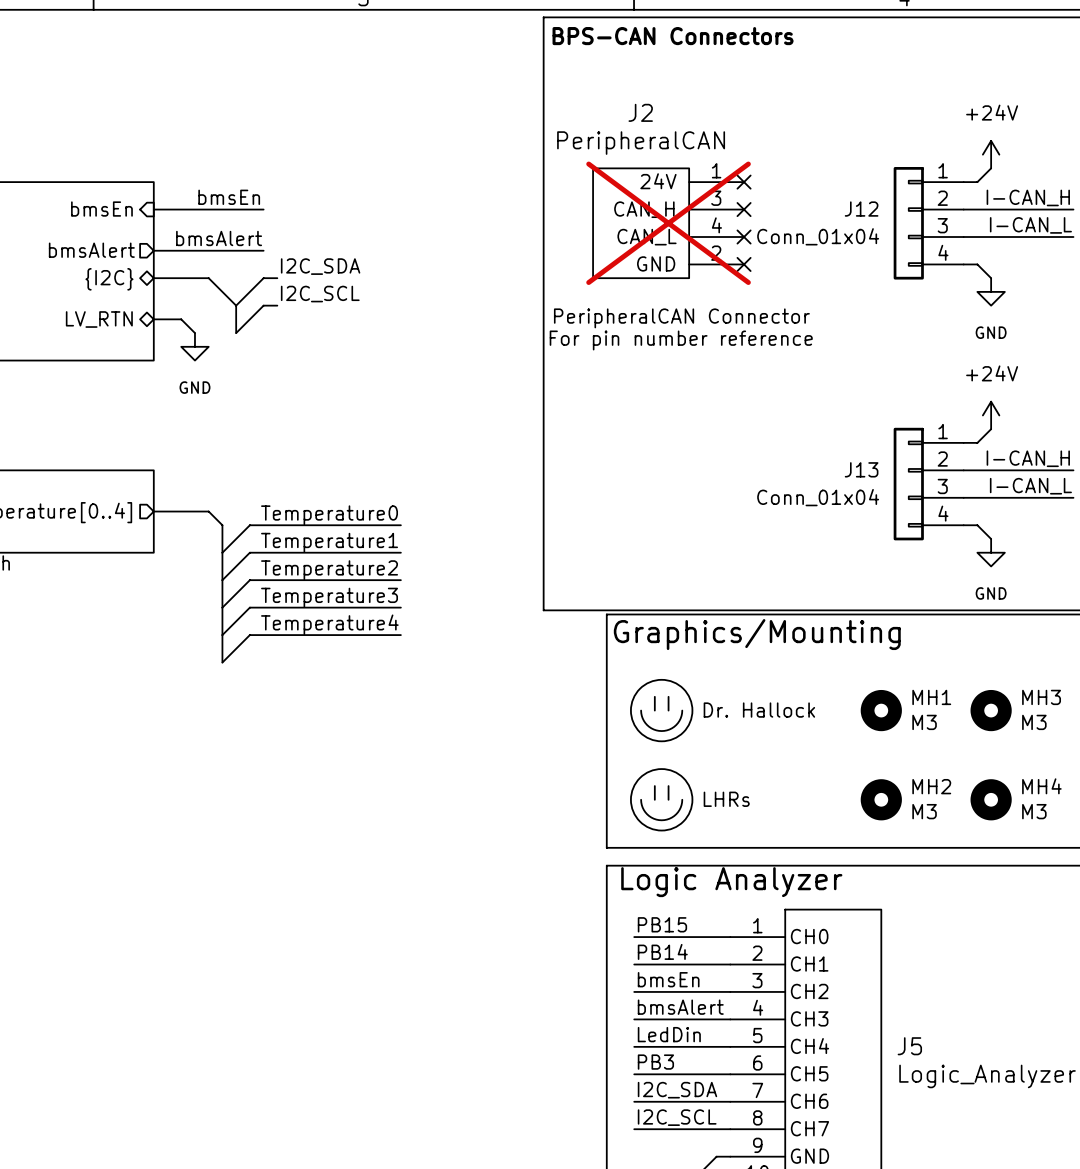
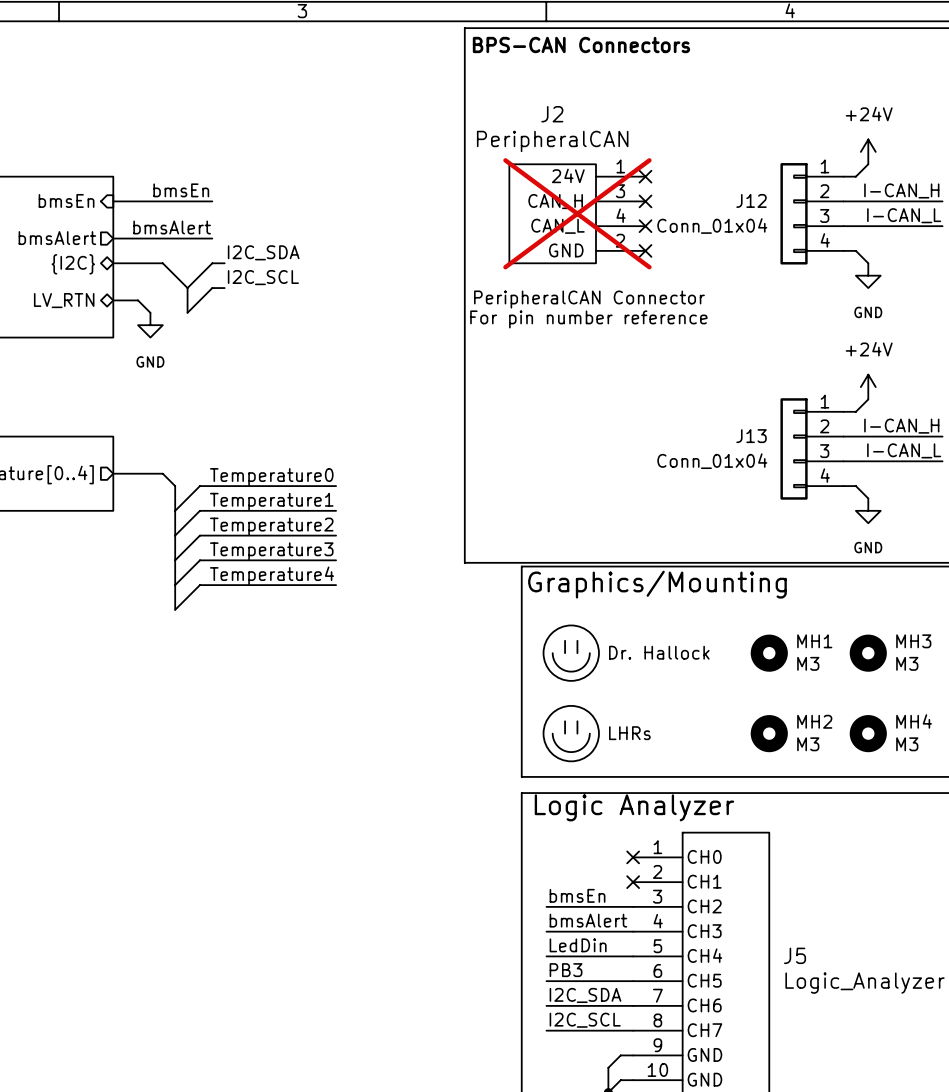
label: PB15 (662, 924) -> none
wire: (634, 937) (730, 937) -> none
no-connect mark: none -> (633, 857)
label: PB14 (662, 951) -> none
wire: (634, 964) (730, 964) -> none
no-connect mark: none -> (633, 882)

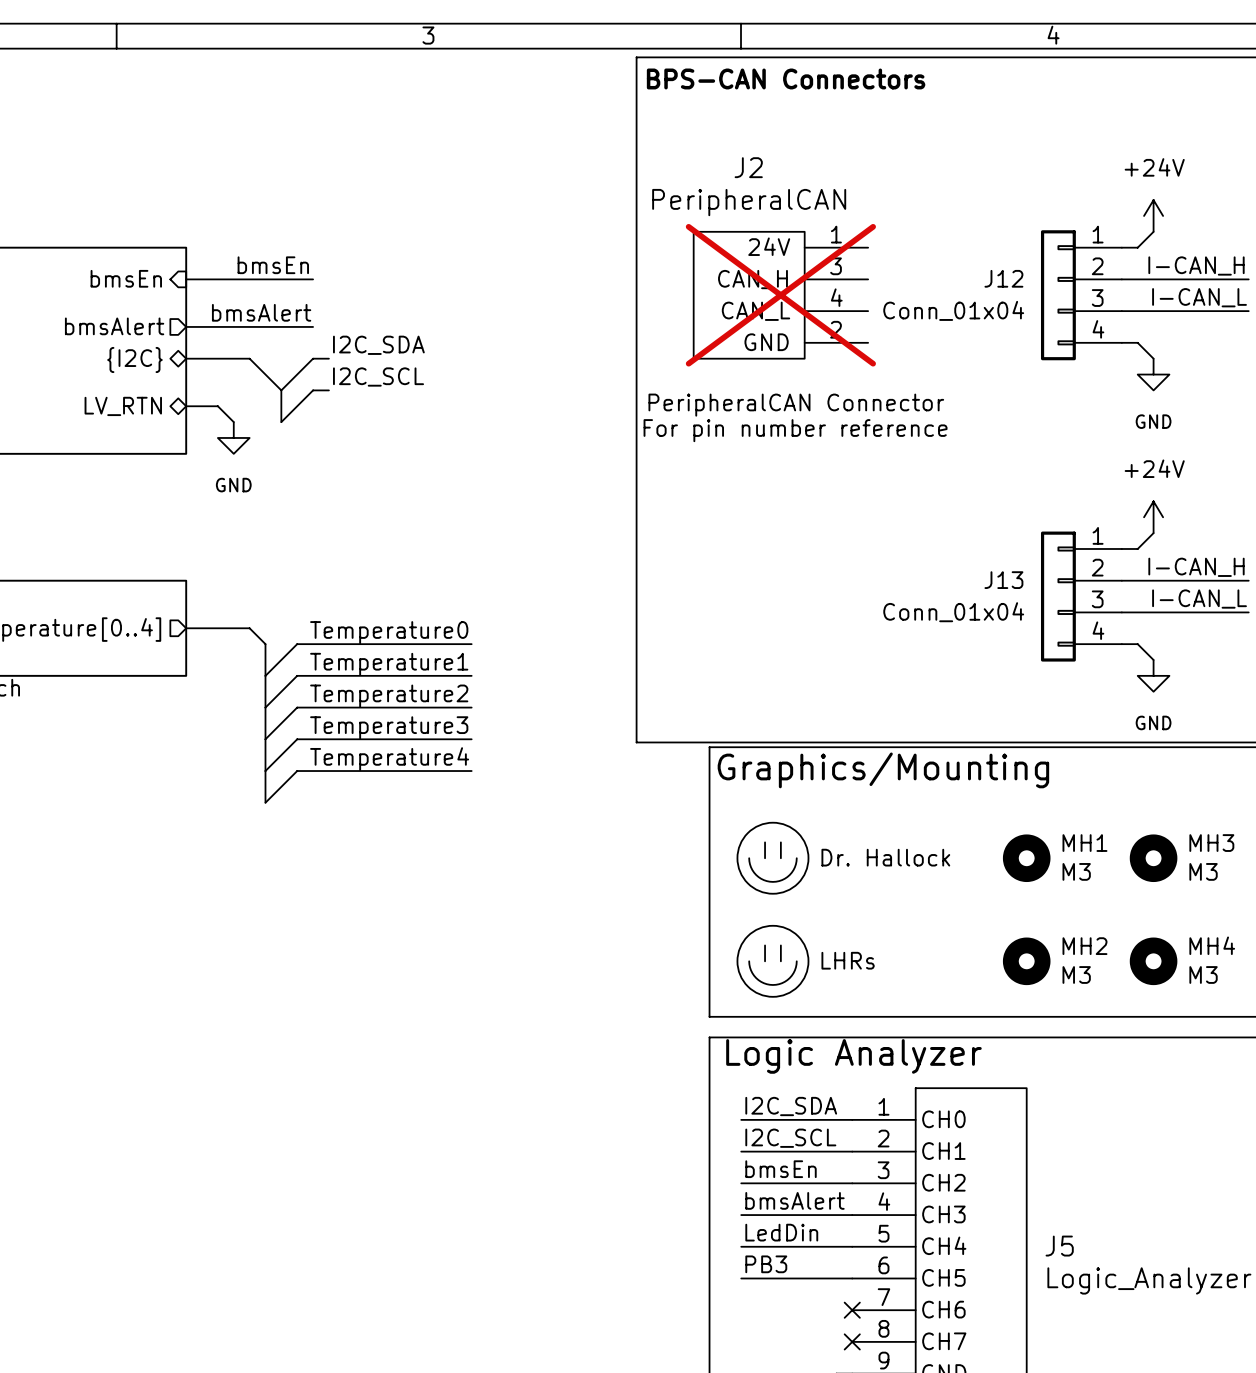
no-connect mark: (645, 176) -> none
no-connect mark: (645, 201) -> none
no-connect mark: (645, 226) -> none
no-connect mark: (645, 250) -> none
no-connect mark: (633, 857) -> none
no-connect mark: (633, 882) -> none
label position: I2C_SDA (585, 995) -> I2C_SDA (791, 1106)
wire: (546, 1005) (633, 1005) -> (741, 1151) (852, 1151)
no-connect mark: none -> (852, 1310)
label position: I2C_SCL (585, 1020) -> I2C_SCL (790, 1138)
wire: (546, 1030) (633, 1030) -> (741, 1119) (852, 1119)
no-connect mark: none -> (852, 1341)

